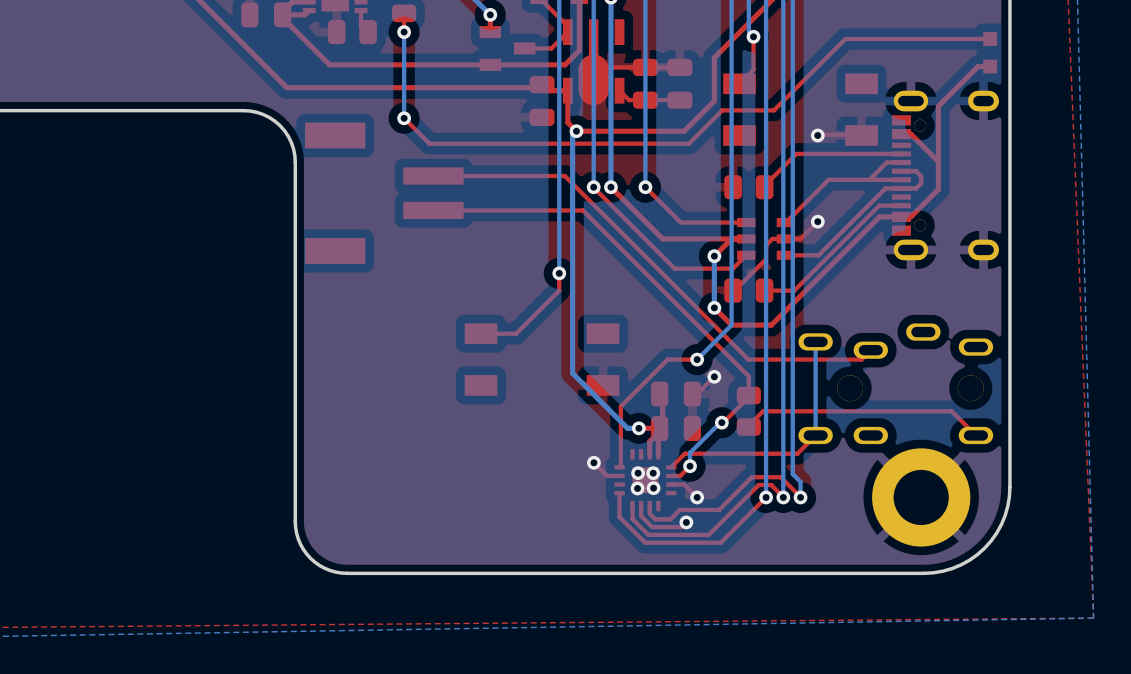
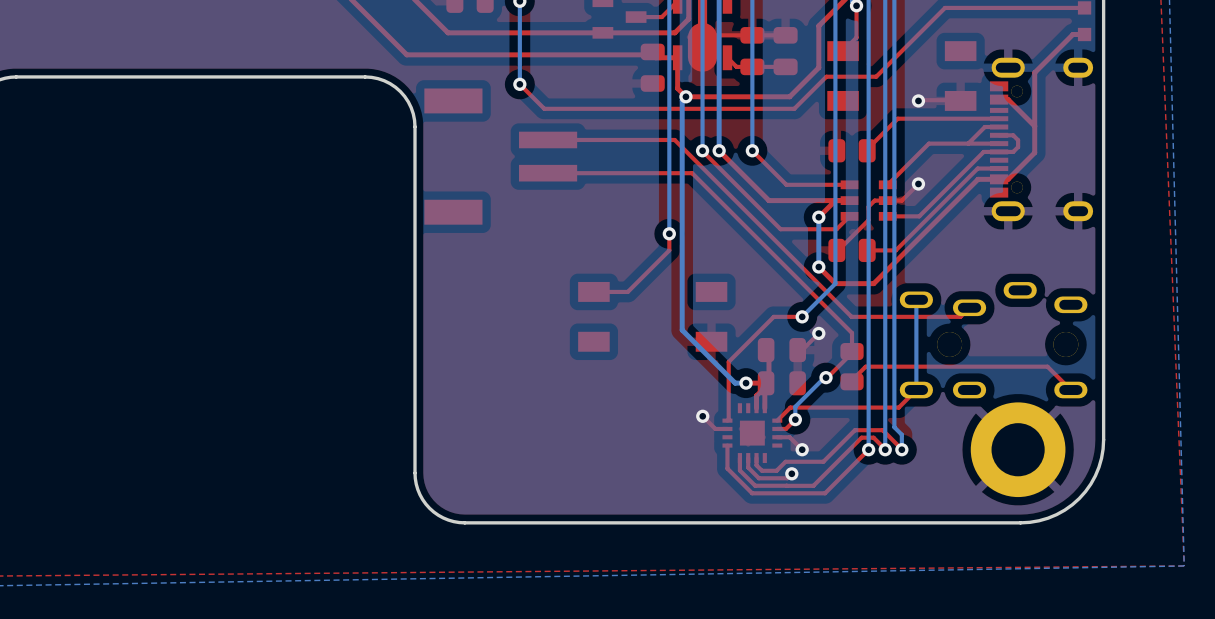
via: (638, 473) -> none
via: (653, 473) -> none
via: (637, 488) -> none
via: (653, 488) -> none

